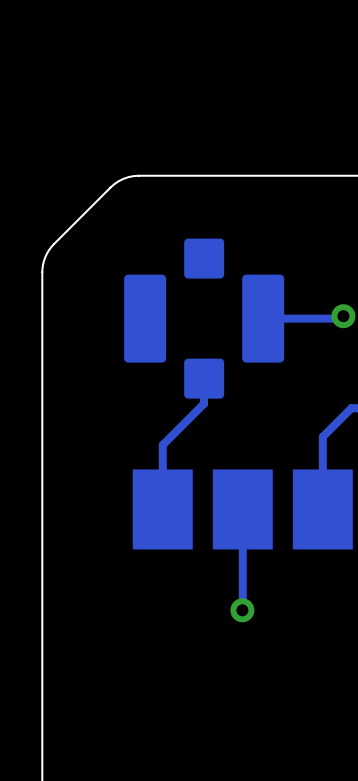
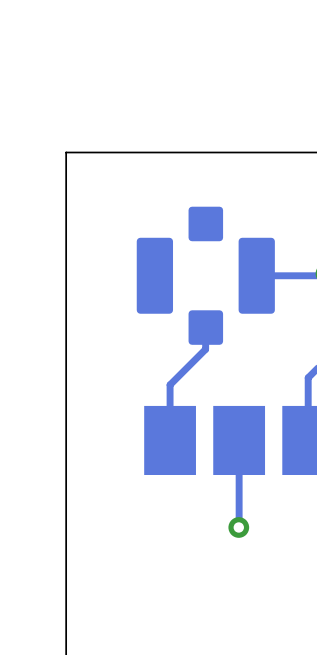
board edge: (138, 175) (128, 177) (114, 184) (54, 244) (45, 257) (42, 272) -> (149, 152) (66, 152) (66, 235)

